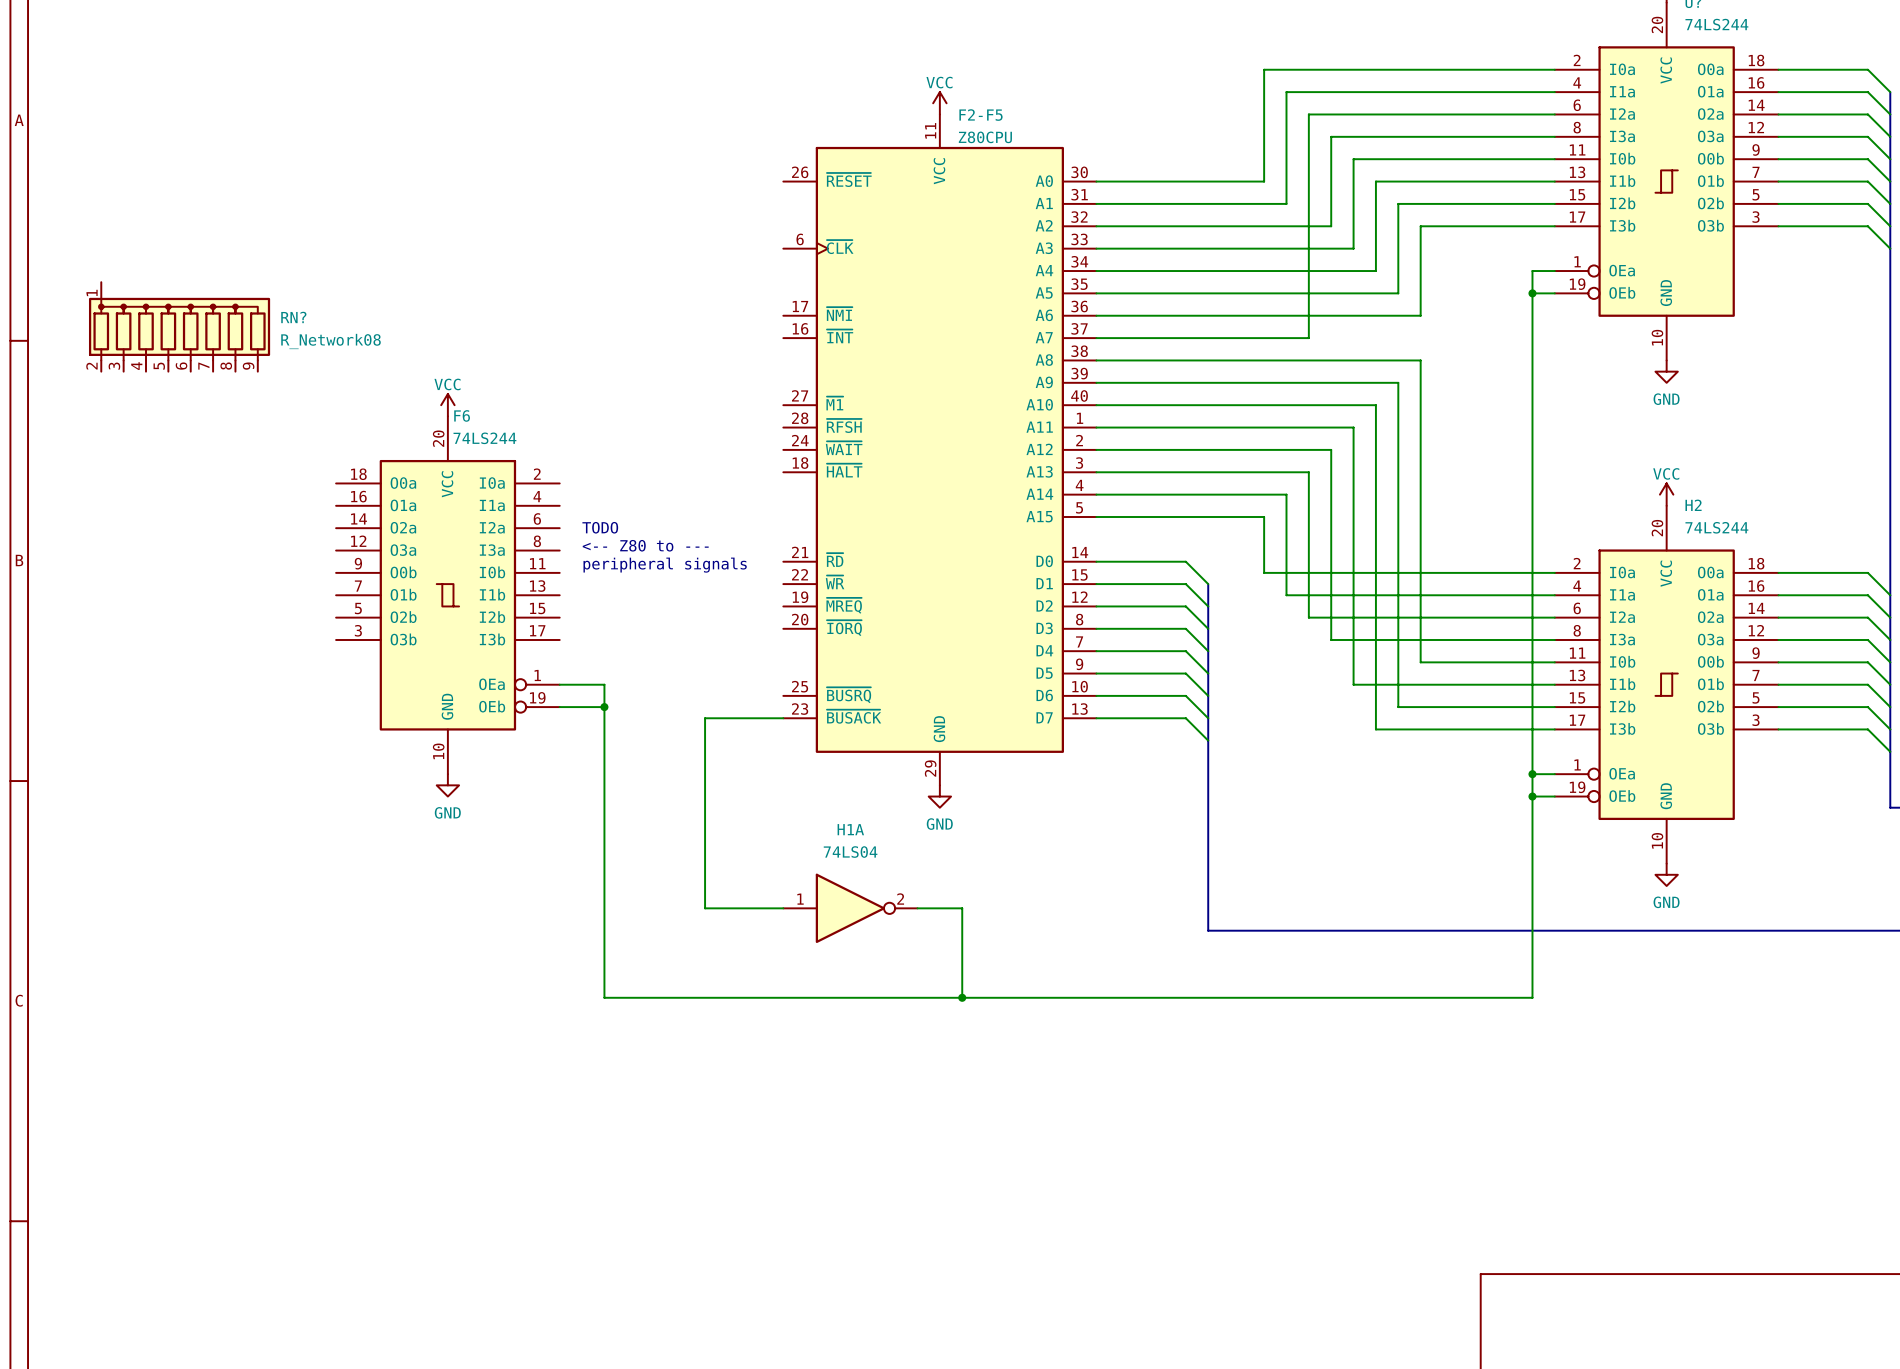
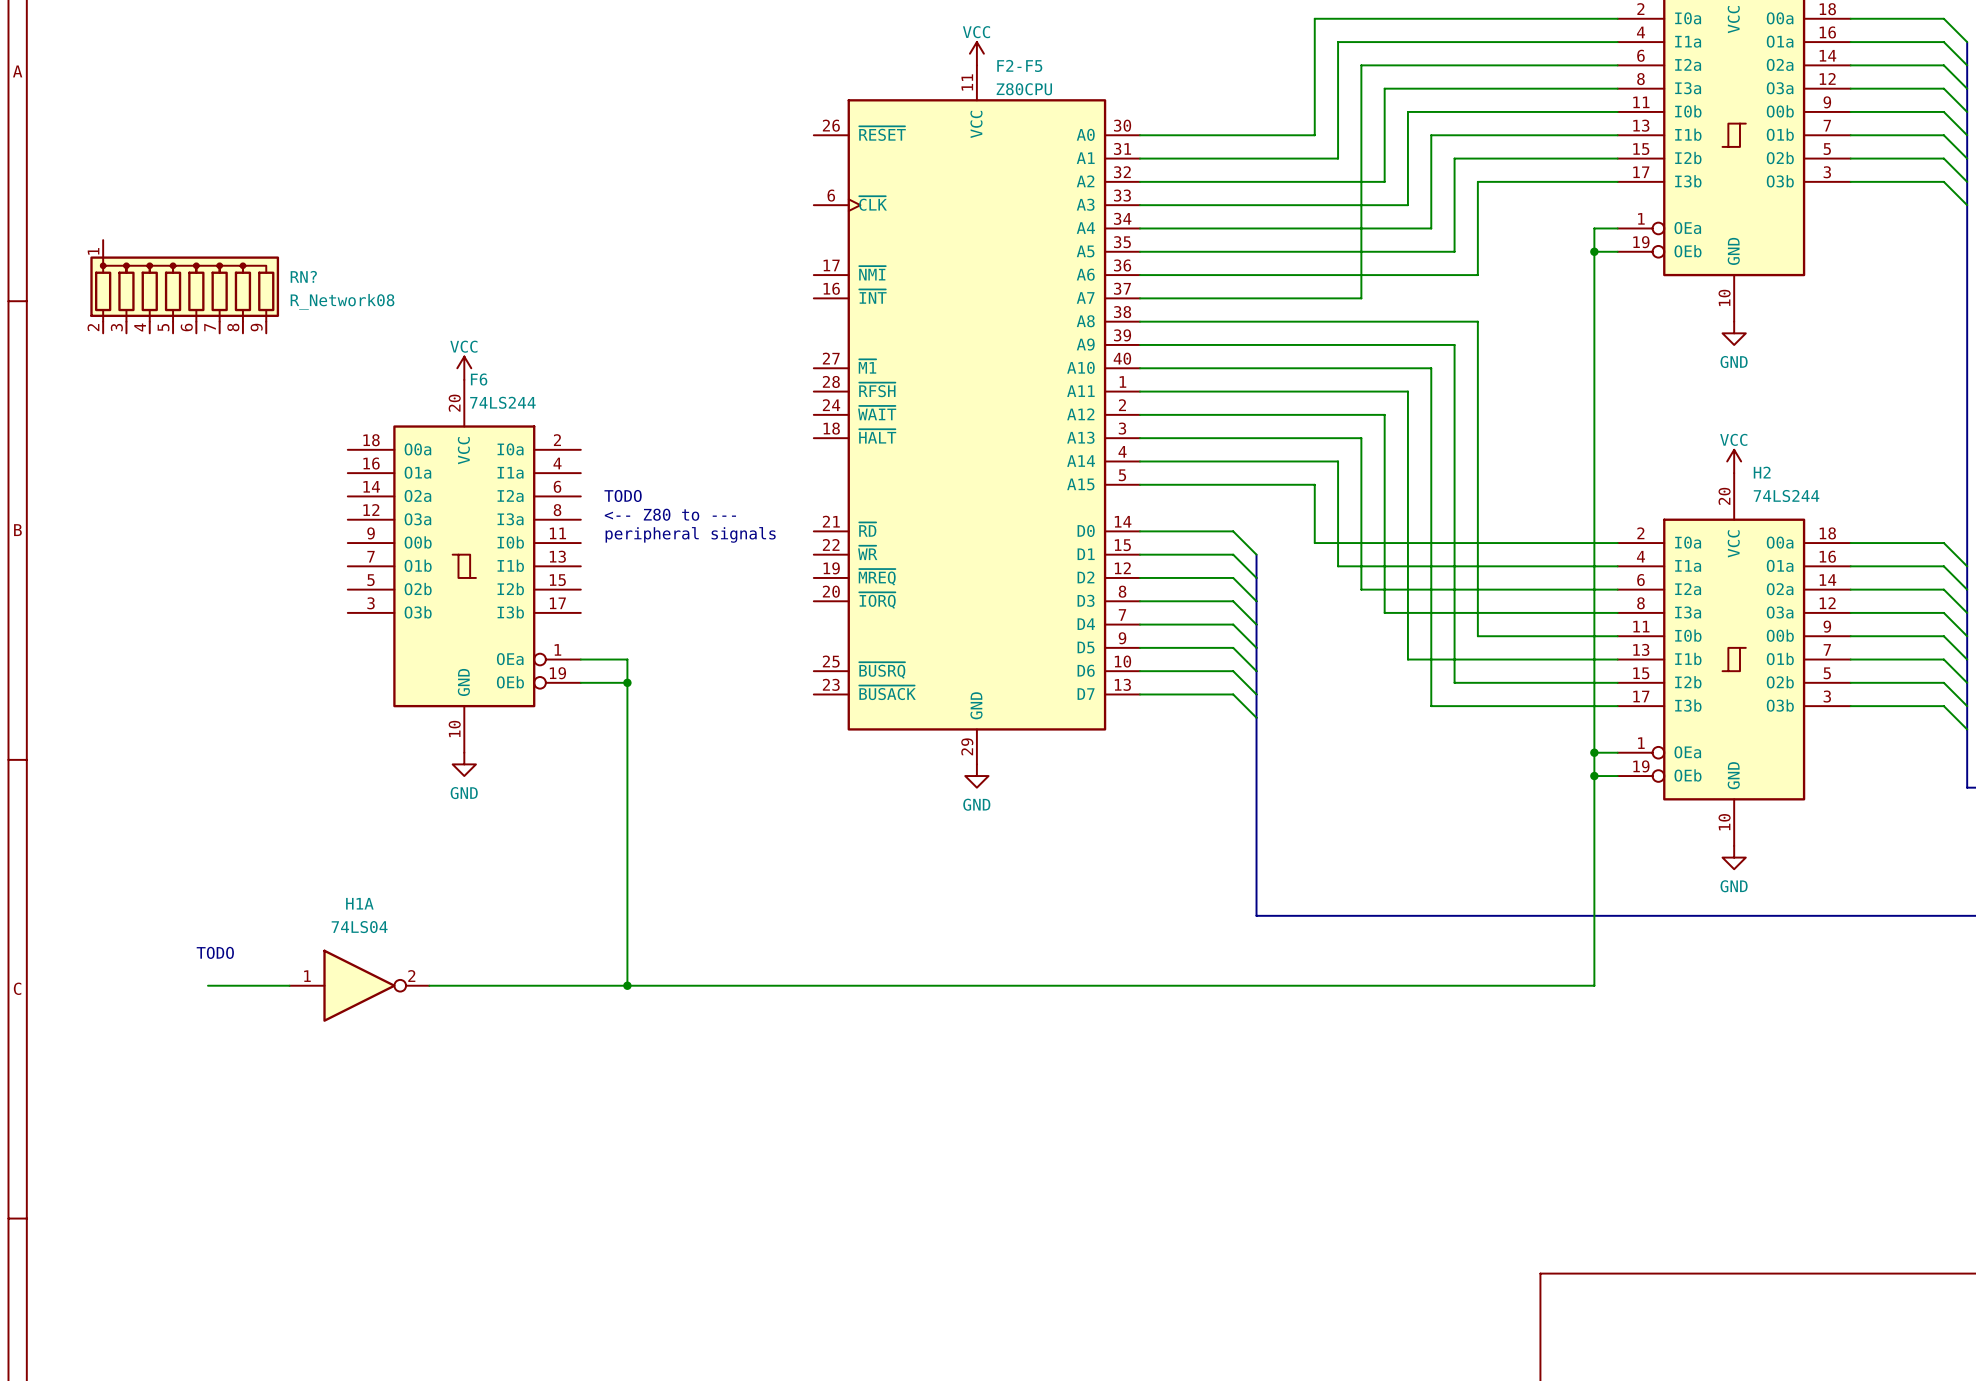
wire: (783, 718) (705, 718) (705, 908) (783, 908) -> none
H1A position: (850, 908) -> (359, 985)
wire: (917, 908) (962, 908) (962, 997) -> none
text: none -> TODO (215, 952)
wire: none -> (208, 985) (289, 985)
wire: none -> (429, 985) (627, 985)
junction: none -> (627, 985)
junction: (962, 997) -> none

